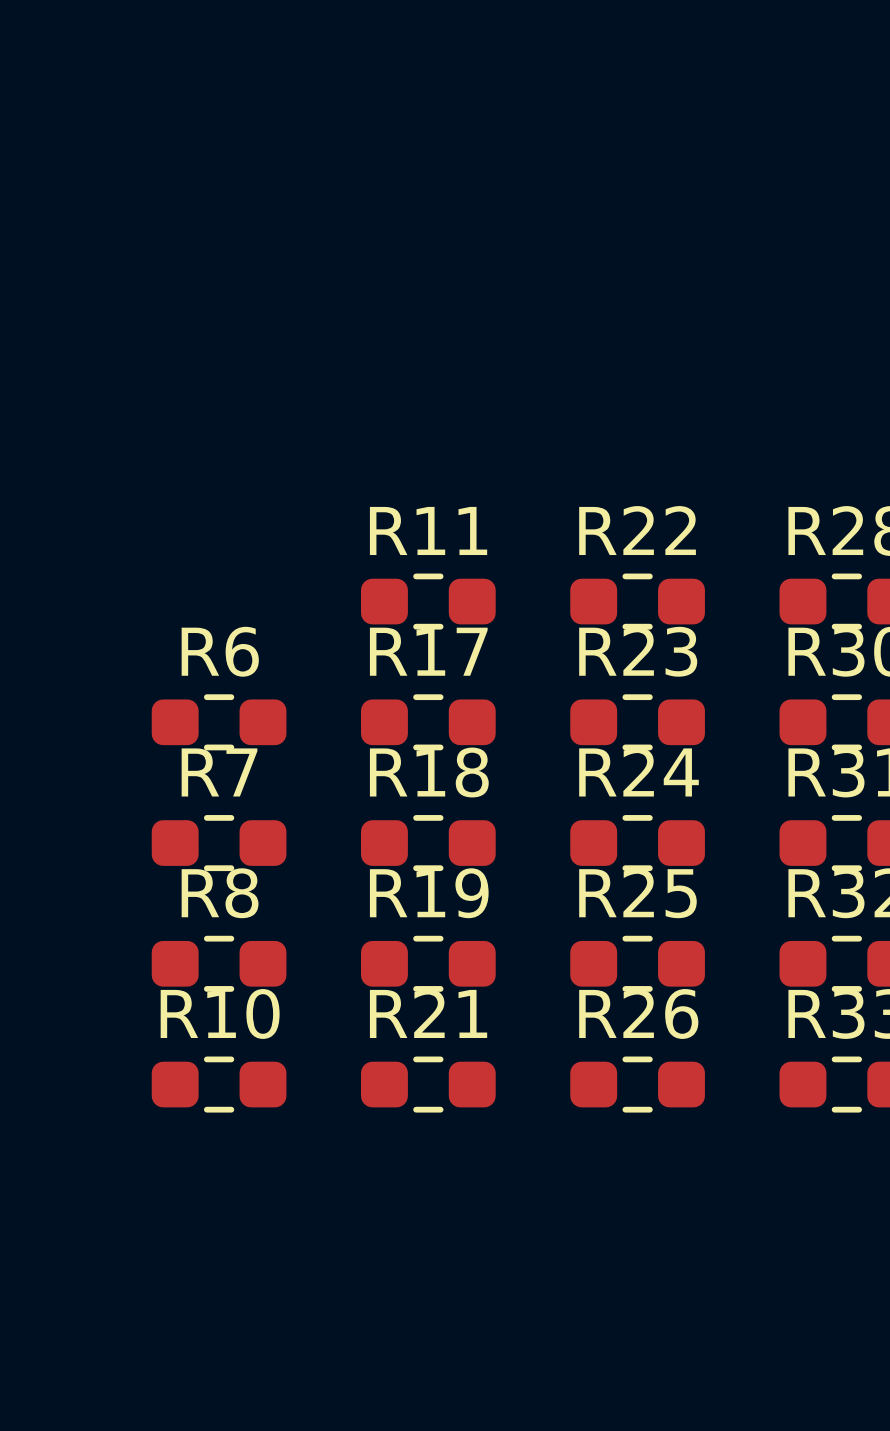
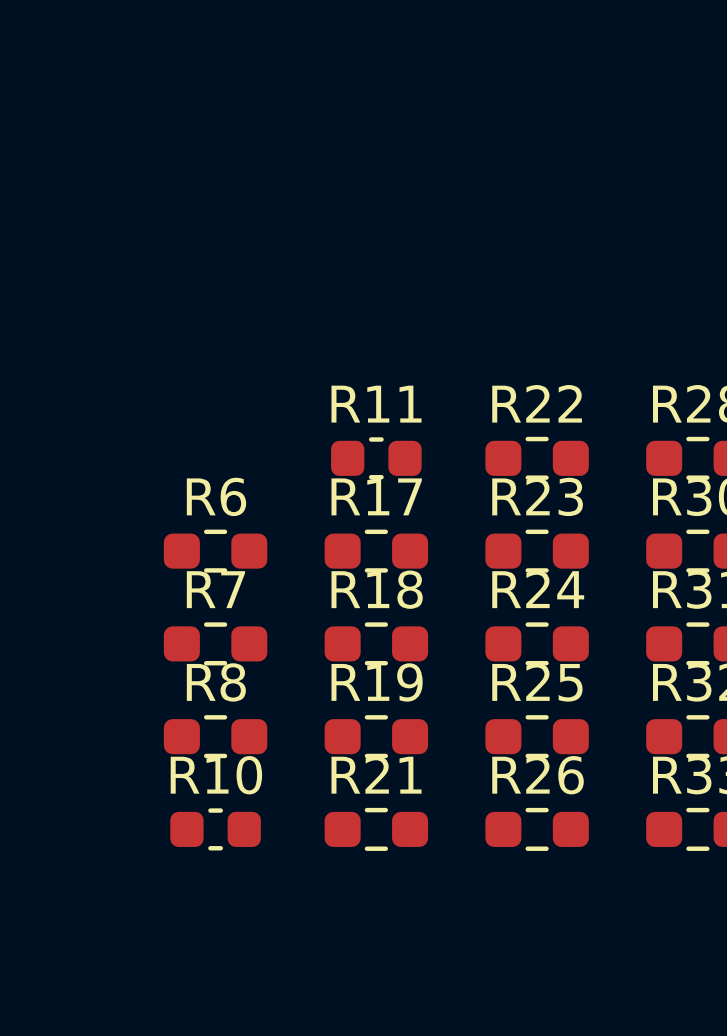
R11 footprint: [361, 573, 496, 630] -> [331, 437, 422, 480]
R10 footprint: [151, 1056, 287, 1113] -> [170, 808, 261, 851]

